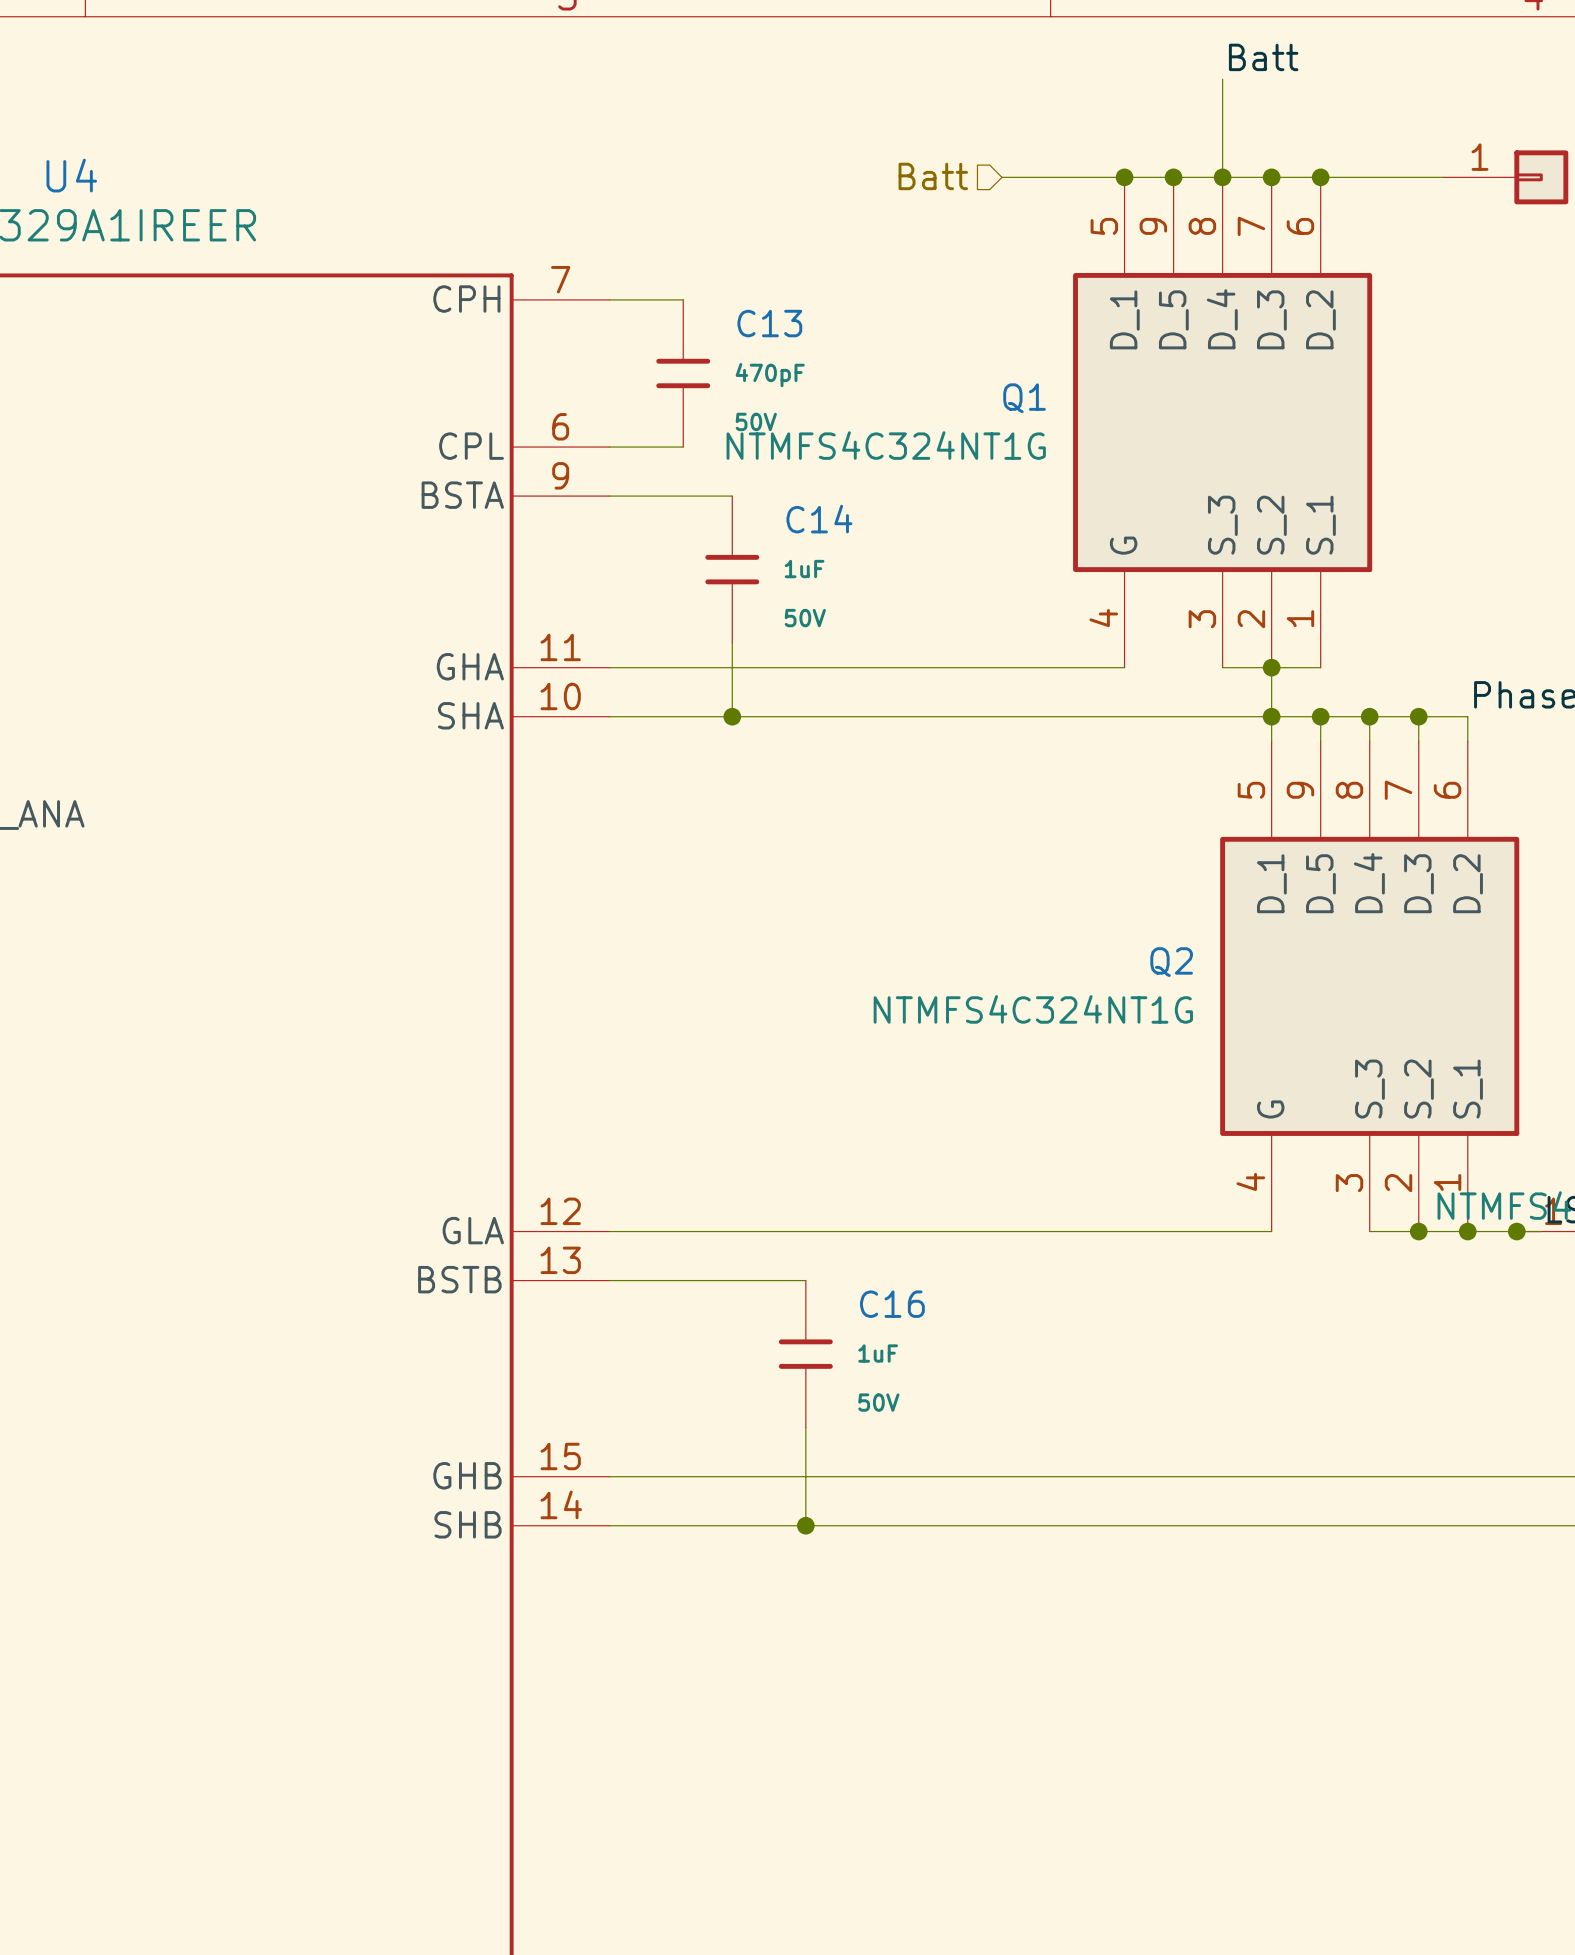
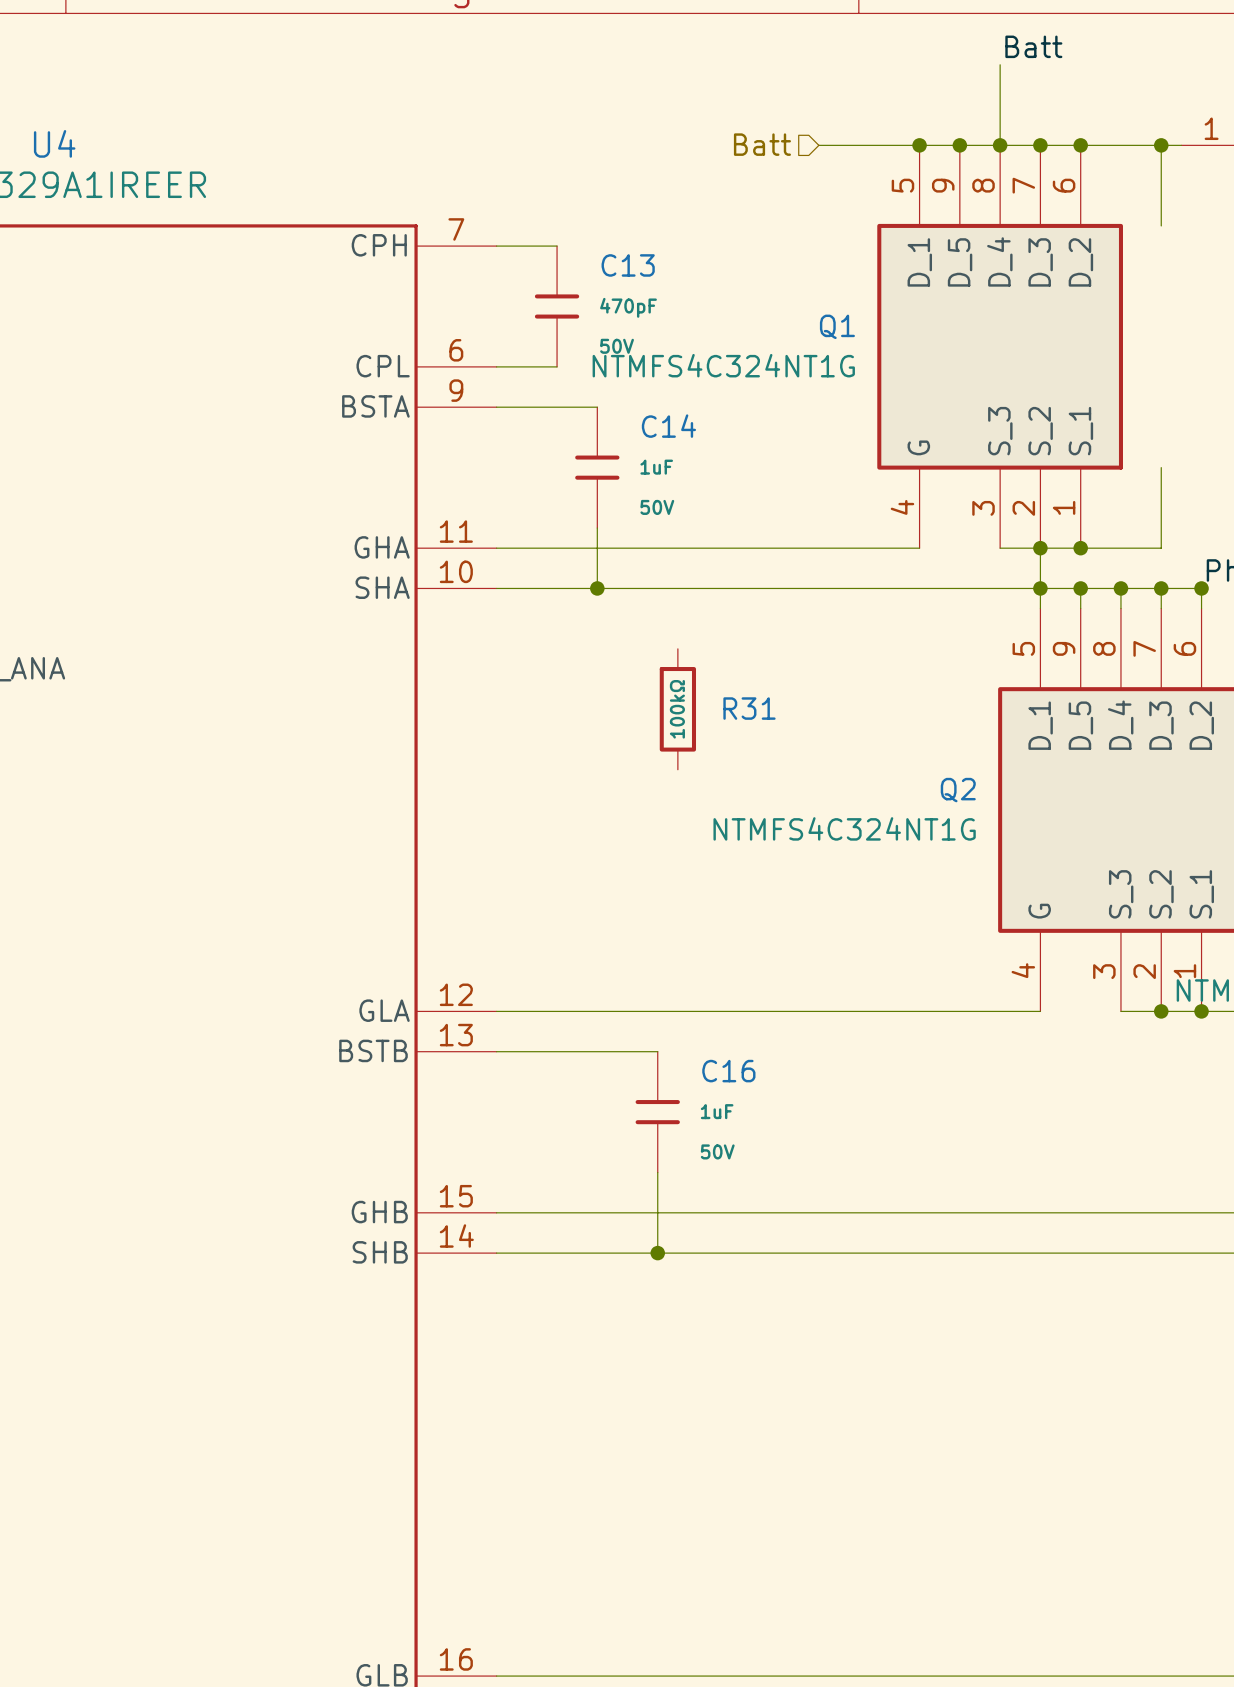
wire: none -> (1161, 145) (1161, 225)
junction: none -> (1161, 145)
wire: none -> (1161, 467) (1161, 548) (1080, 548)
junction: none -> (1080, 548)
junction: none -> (1201, 588)
R31: none -> 100kΩ (677, 709)

